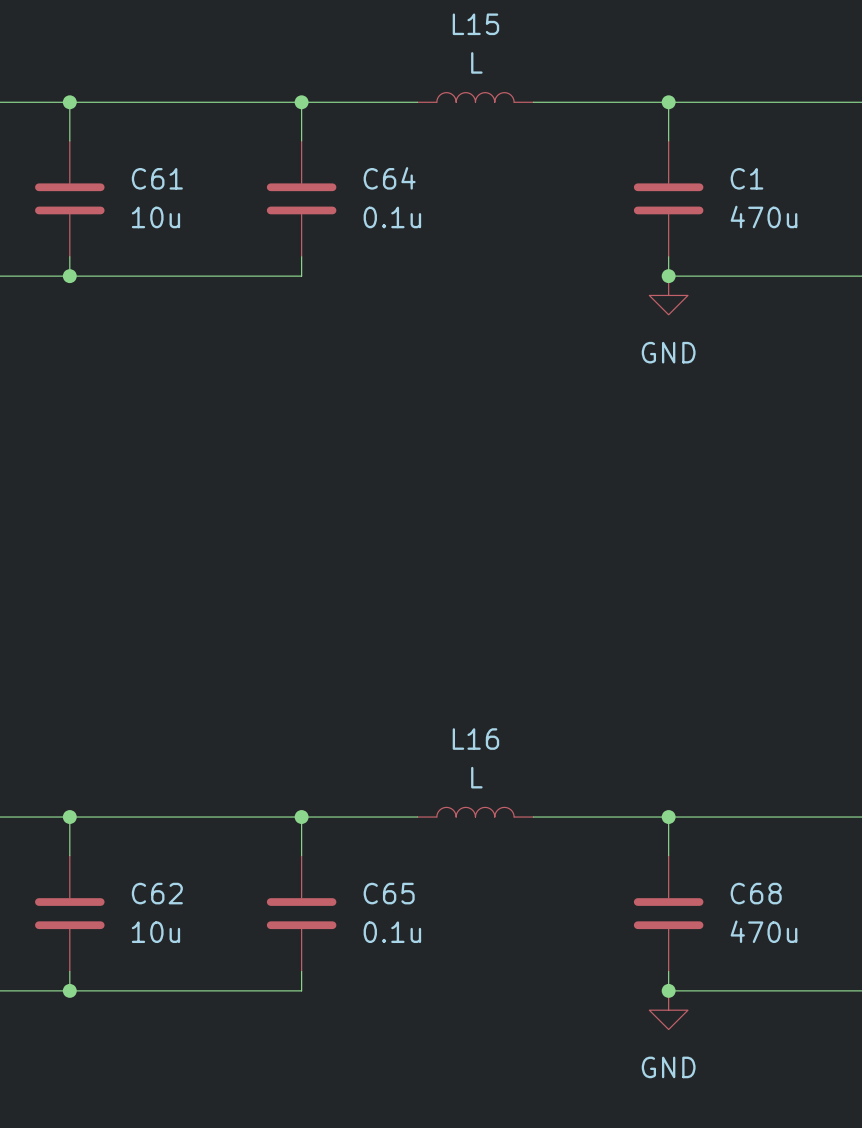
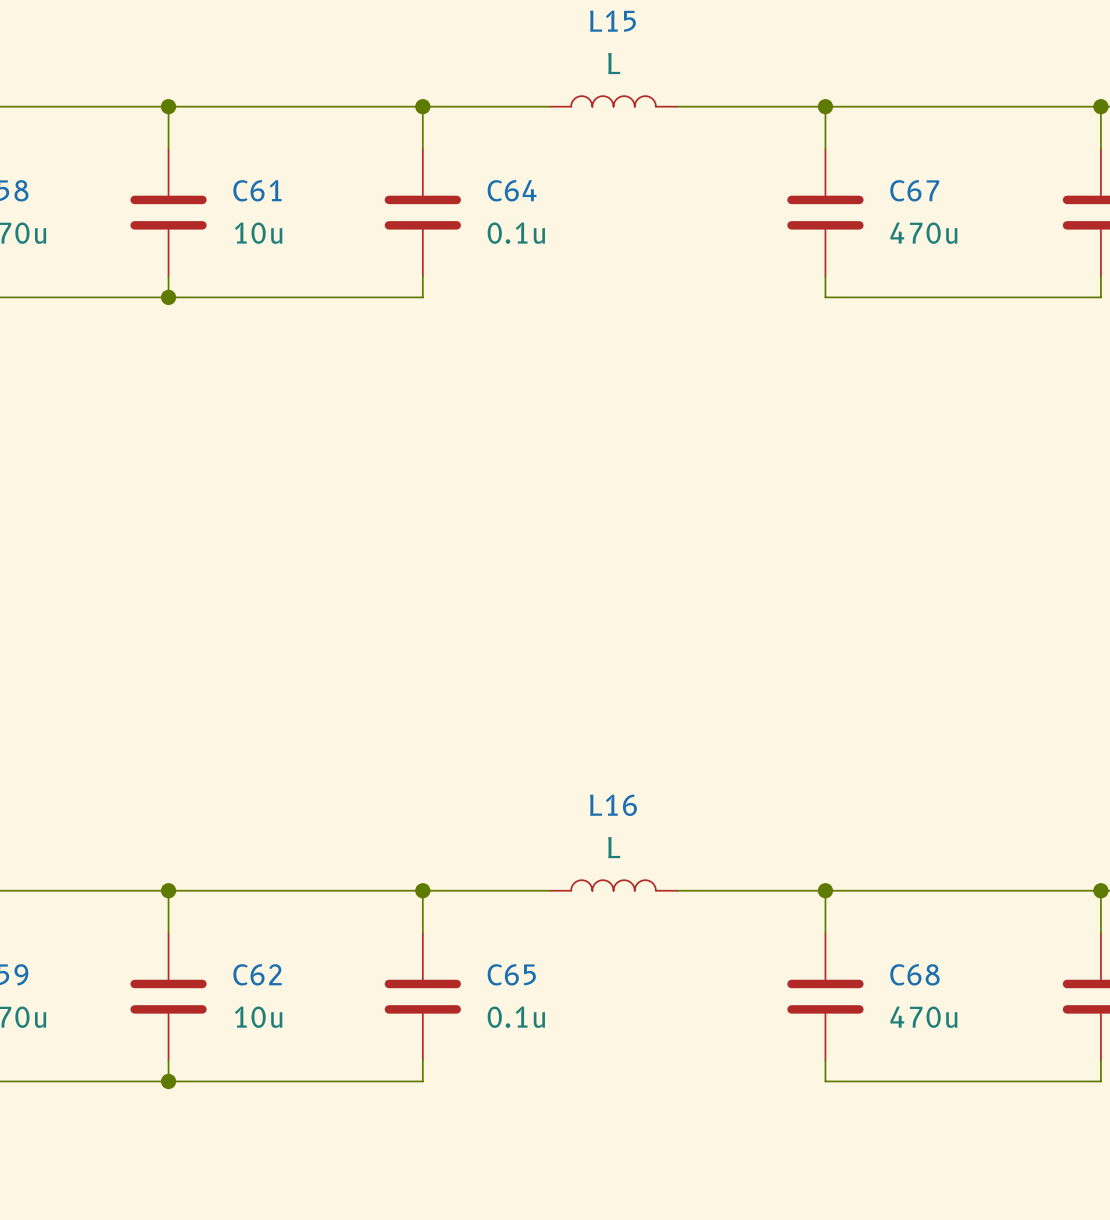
C1 name: C1 (746, 178) -> C67 (914, 190)
junction: (668, 276) -> none
power symbol: GND (668, 295) -> none
junction: (668, 990) -> none
power symbol: GND (668, 1010) -> none

